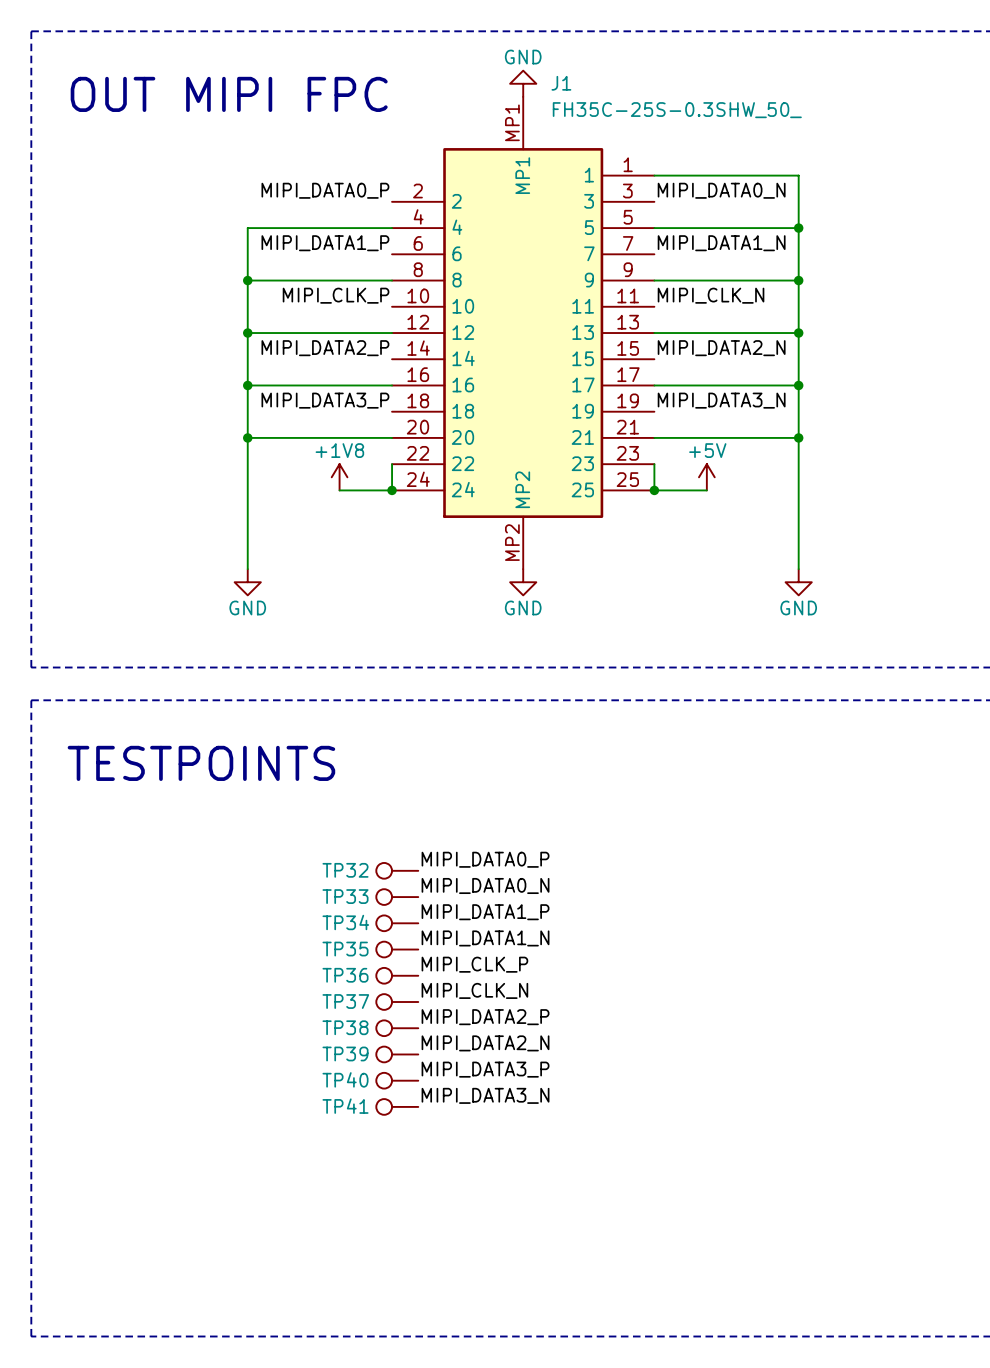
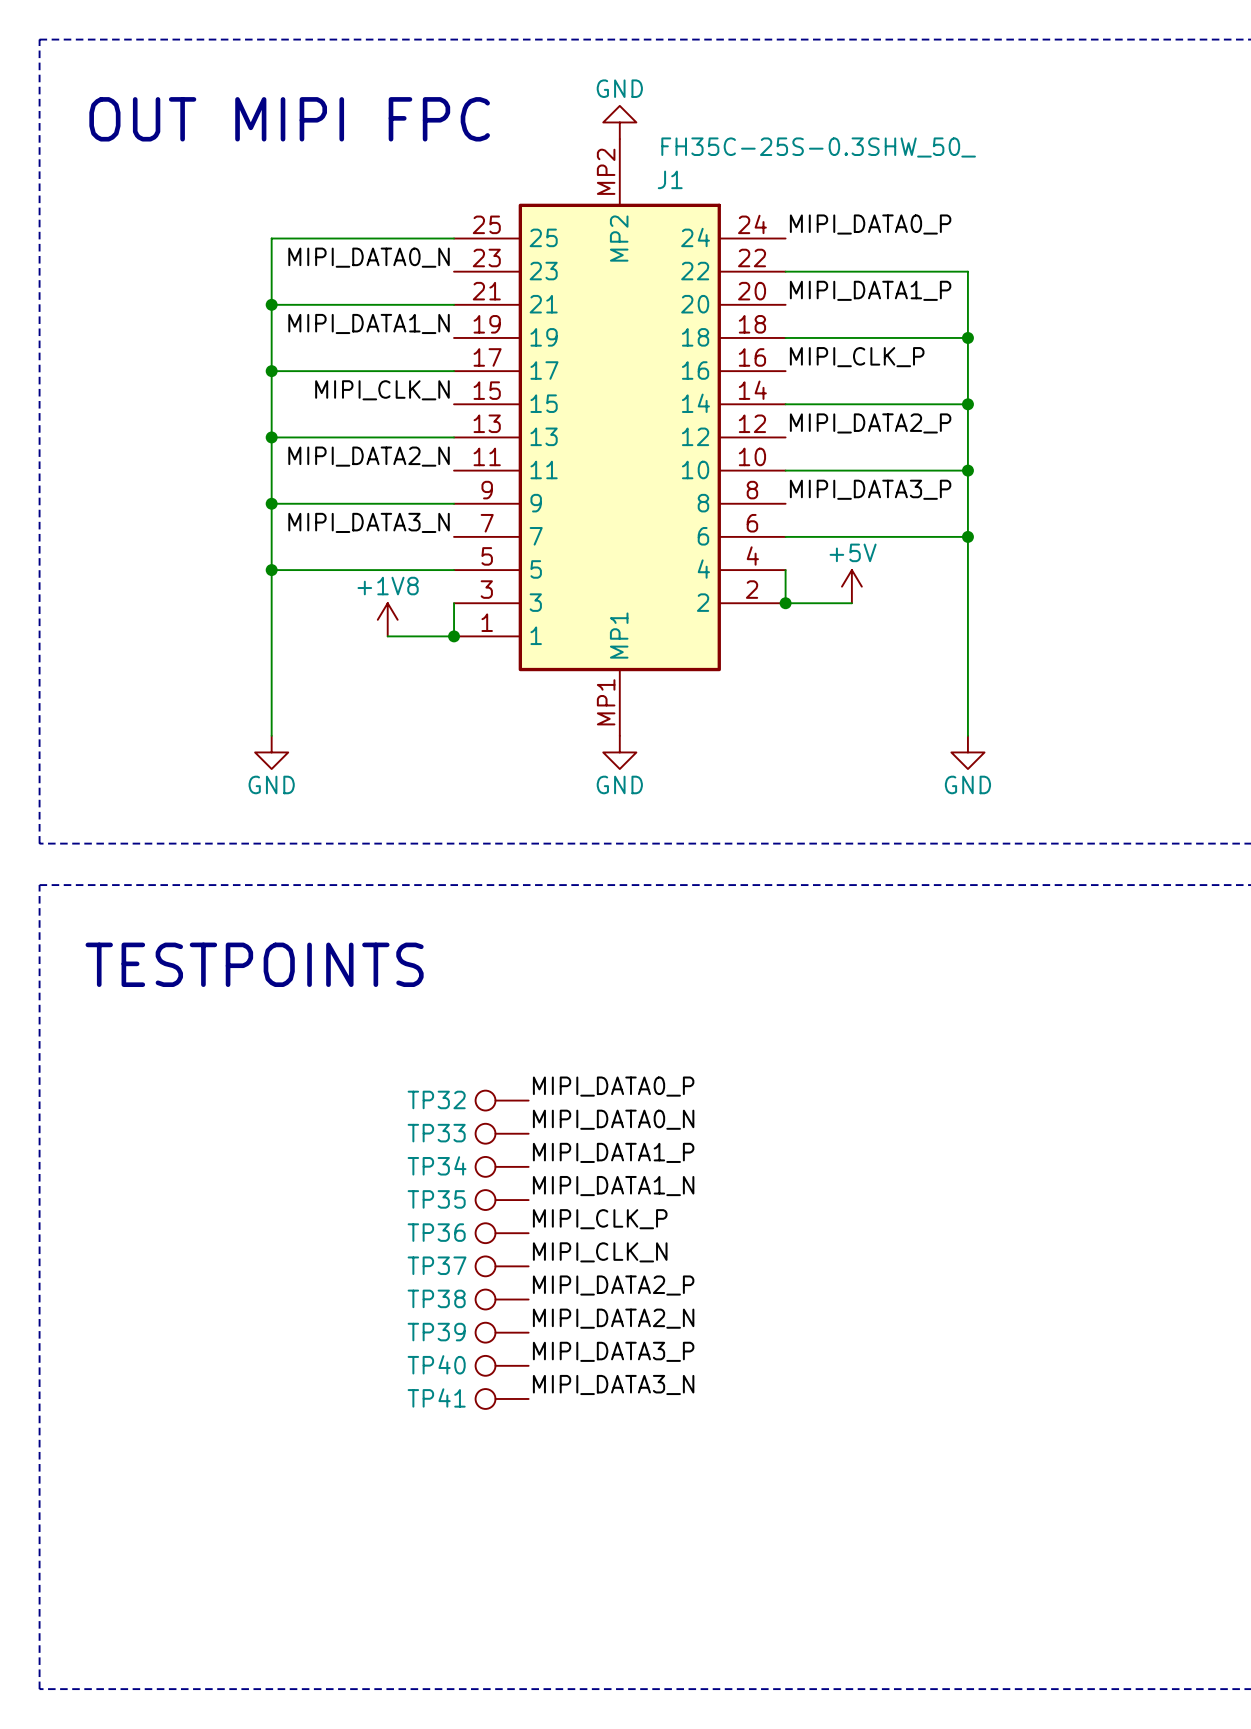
power symbol position: GND (523, 83) -> GND (619, 122)
J1 name position: J1 (561, 83) -> J1 (670, 179)
J1 value position: FH35C-25S-0.3SHW_50_ (677, 110) -> FH35C-25S-0.3SHW_50_ (818, 147)
wire: (654, 175) (798, 175) (798, 569) -> none
wire: none -> (454, 238) (271, 238) (271, 735)
label position: MIPI_DATA0_P (325, 190) -> MIPI_DATA0_P (870, 224)
label: MIPI_DATA0_N (721, 190) -> none
label: none -> MIPI_DATA0_N (369, 257)
wire: none -> (785, 271) (967, 271) (967, 735)
wire: (392, 228) (247, 228) (247, 569) -> none
wire: (654, 228) (798, 228) -> none
junction: (798, 228) -> none
wire: none -> (271, 304) (454, 304)
junction: none -> (271, 304)
label position: MIPI_DATA1_P (325, 243) -> MIPI_DATA1_P (870, 290)
label: MIPI_DATA1_N (721, 243) -> none
label: none -> MIPI_DATA1_N (369, 323)
junction: none -> (967, 337)
wire: (247, 280) (392, 280) -> (271, 371) (454, 371)
junction: (247, 280) -> none
wire: (654, 280) (798, 280) -> (785, 337) (967, 337)
junction: (798, 280) -> none
junction: none -> (271, 371)
label position: MIPI_CLK_P (336, 295) -> MIPI_CLK_P (857, 357)
label: MIPI_CLK_N (711, 295) -> none
label: none -> MIPI_CLK_N (382, 390)
junction: none -> (967, 404)
wire: (247, 333) (392, 333) -> (271, 437) (454, 437)
junction: (247, 333) -> none
J1 rotation: 0° (523, 333) -> 180° (619, 437)
wire: (654, 333) (798, 333) -> (785, 404) (967, 404)
junction: (798, 333) -> none
junction: none -> (271, 437)
label position: MIPI_DATA2_P (325, 348) -> MIPI_DATA2_P (870, 423)
label: MIPI_DATA2_N (721, 348) -> none
label: none -> MIPI_DATA2_N (369, 456)
junction: none -> (967, 470)
wire: (247, 385) (392, 385) -> (271, 503) (454, 503)
junction: (247, 385) -> none
wire: (654, 385) (798, 385) -> (785, 470) (967, 470)
junction: (798, 385) -> none
junction: none -> (271, 503)
label position: MIPI_DATA3_P (325, 400) -> MIPI_DATA3_P (870, 489)
label: MIPI_DATA3_N (721, 400) -> none
label: none -> MIPI_DATA3_N (369, 522)
junction: none -> (967, 536)
wire: (247, 437) (392, 437) -> (271, 570) (454, 570)
junction: (247, 437) -> none
wire: (654, 437) (798, 437) -> (785, 536) (967, 536)
junction: (798, 437) -> none
junction: none -> (271, 570)
wire: (392, 464) (392, 490) (339, 490) -> (454, 603) (454, 636) (387, 636)
wire: (654, 464) (654, 490) (706, 490) -> (785, 570) (785, 603) (851, 603)
power symbol position: +1V8 (339, 477) -> +1V8 (387, 619)
power symbol position: +5V (706, 477) -> +5V (851, 586)
junction position: (392, 490) -> (454, 636)
junction position: (654, 490) -> (785, 603)
power symbol position: GND (247, 582) -> GND (271, 752)
power symbol position: GND (523, 582) -> GND (619, 752)
power symbol position: GND (798, 582) -> GND (967, 752)

